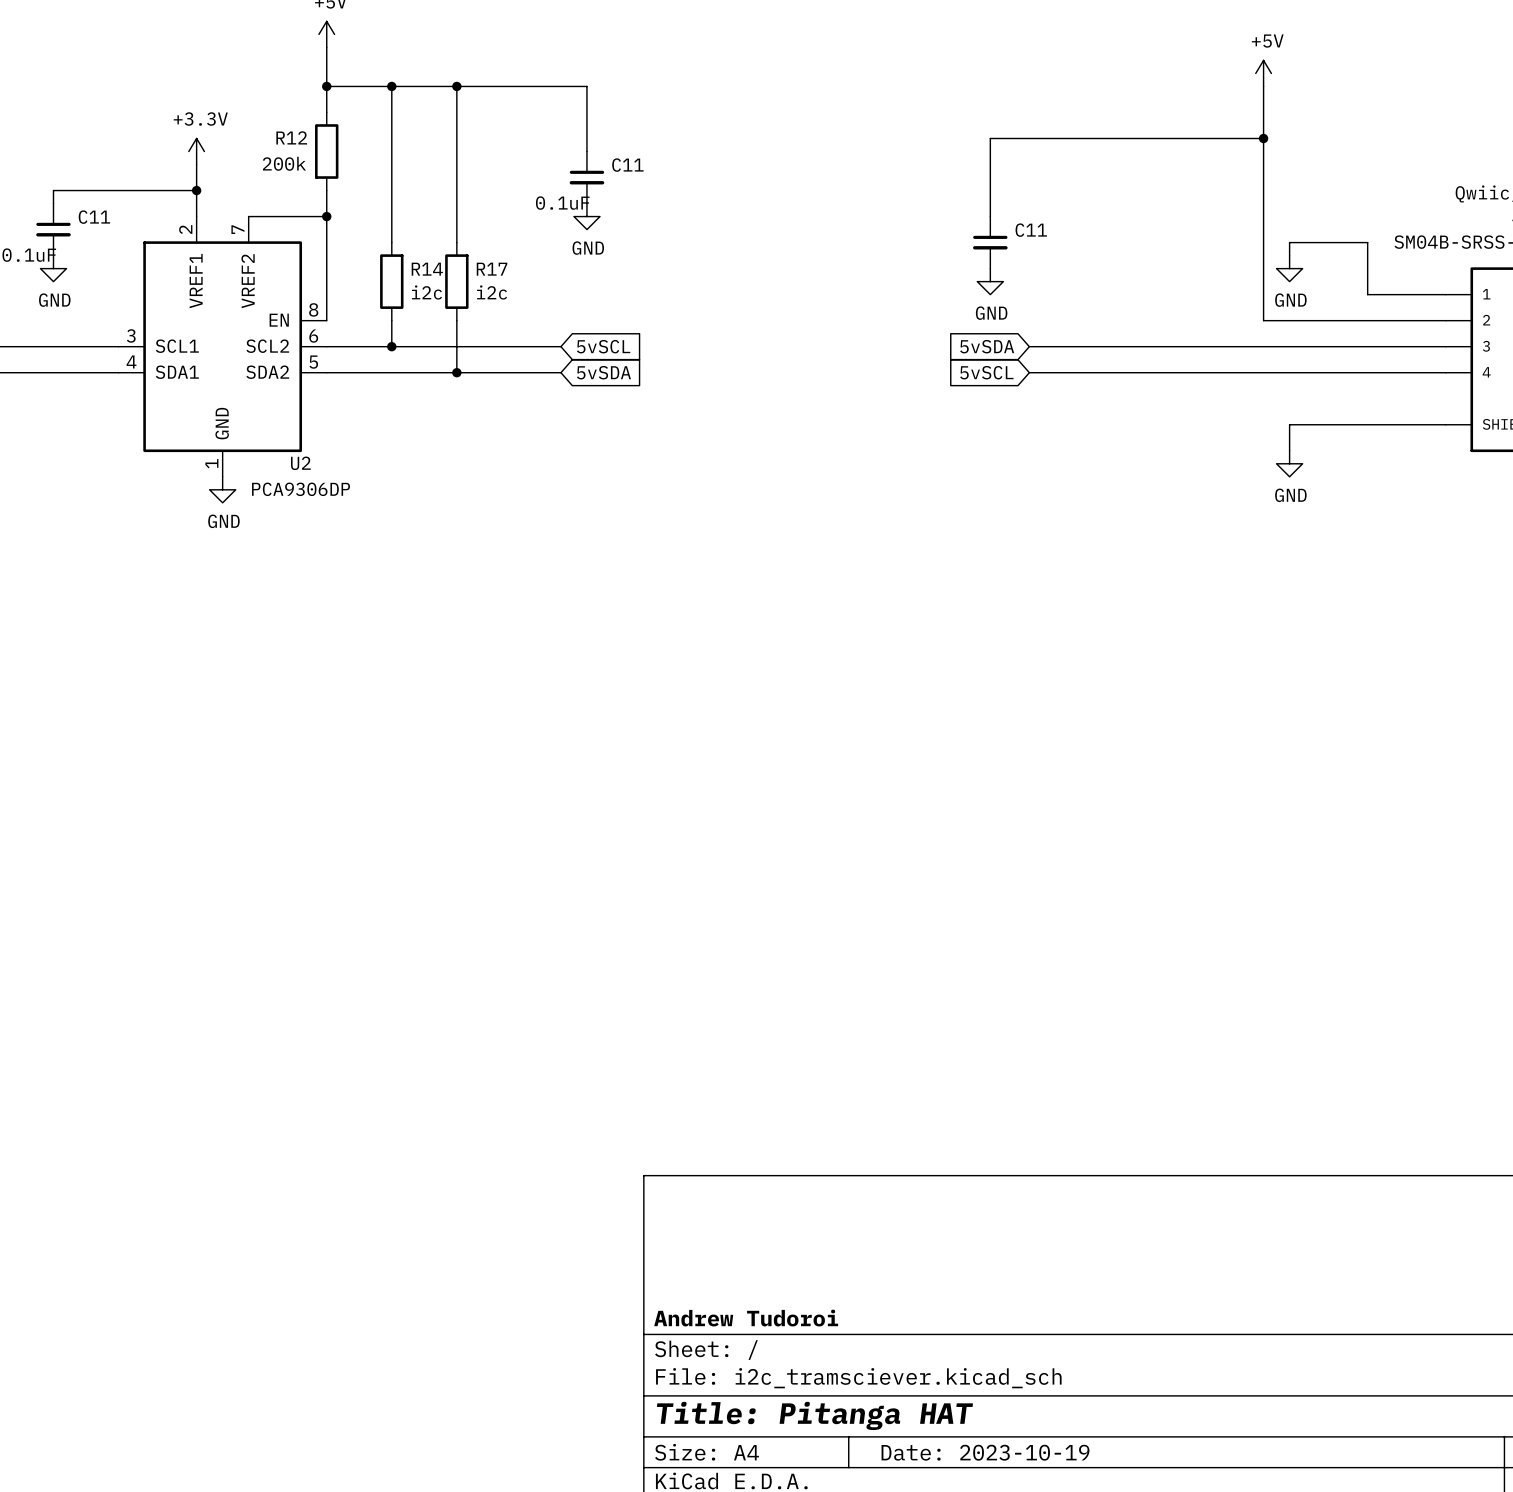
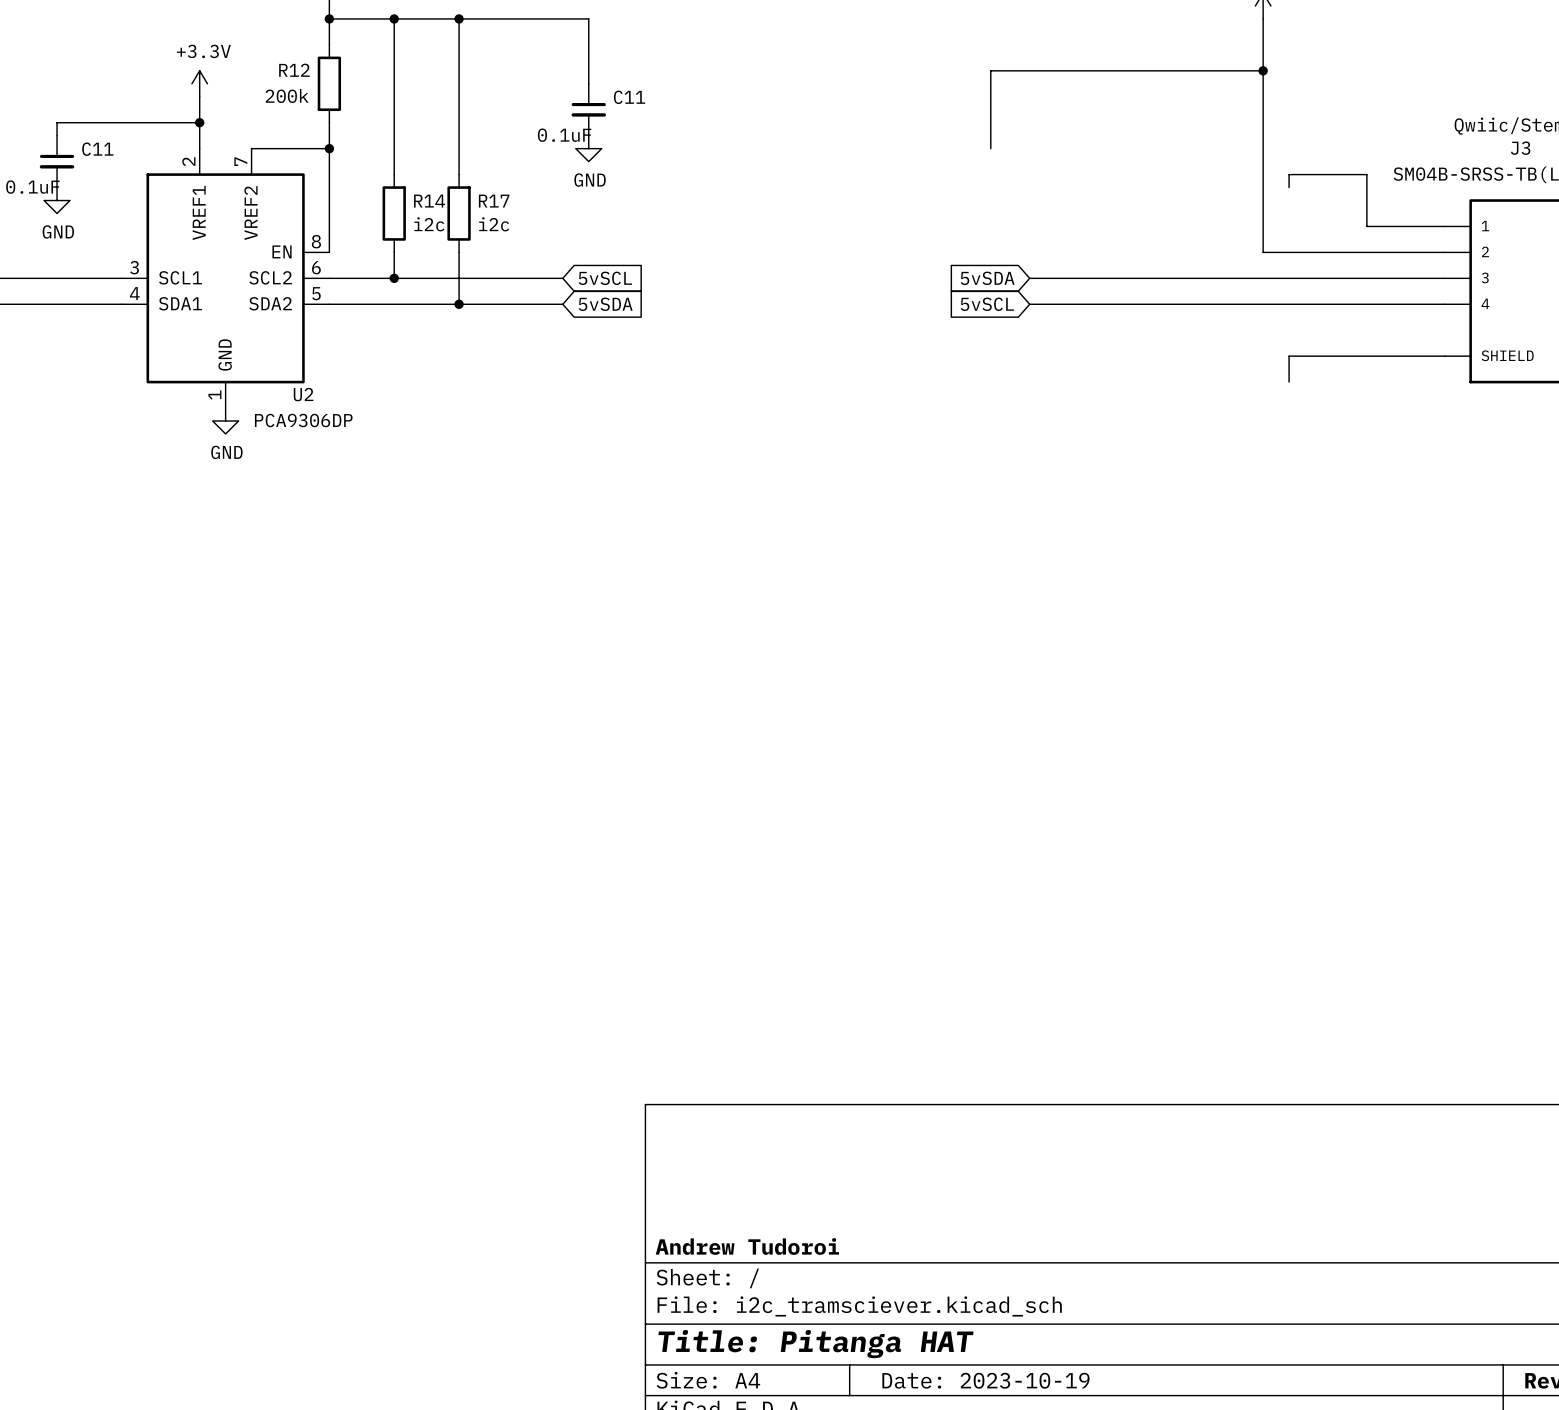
C11: (990, 242) -> none
power symbol: GND (1289, 268) -> none
power symbol: GND (990, 281) -> none
power symbol: GND (1289, 463) -> none

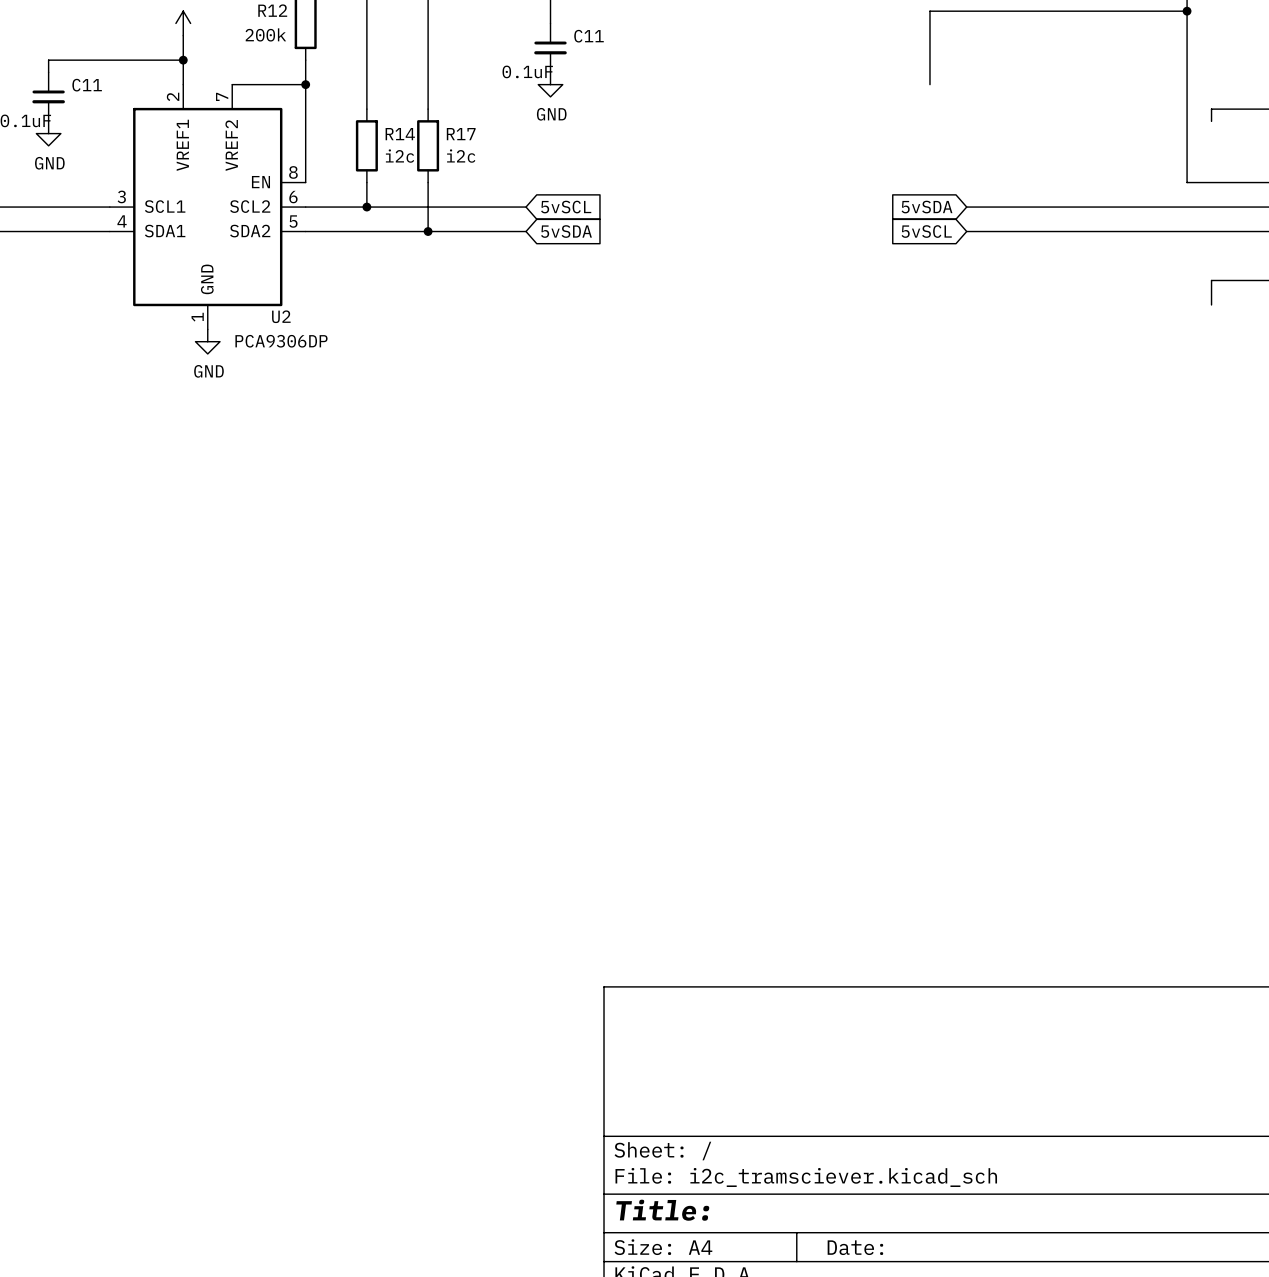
title block: Andrew Tudoroi (747, 1246) -> none
title block: Title: Pitanga HAT (815, 1344) -> Title: (662, 1210)
title block: Date: 2023-10-19 (985, 1380) -> Date: (855, 1247)

